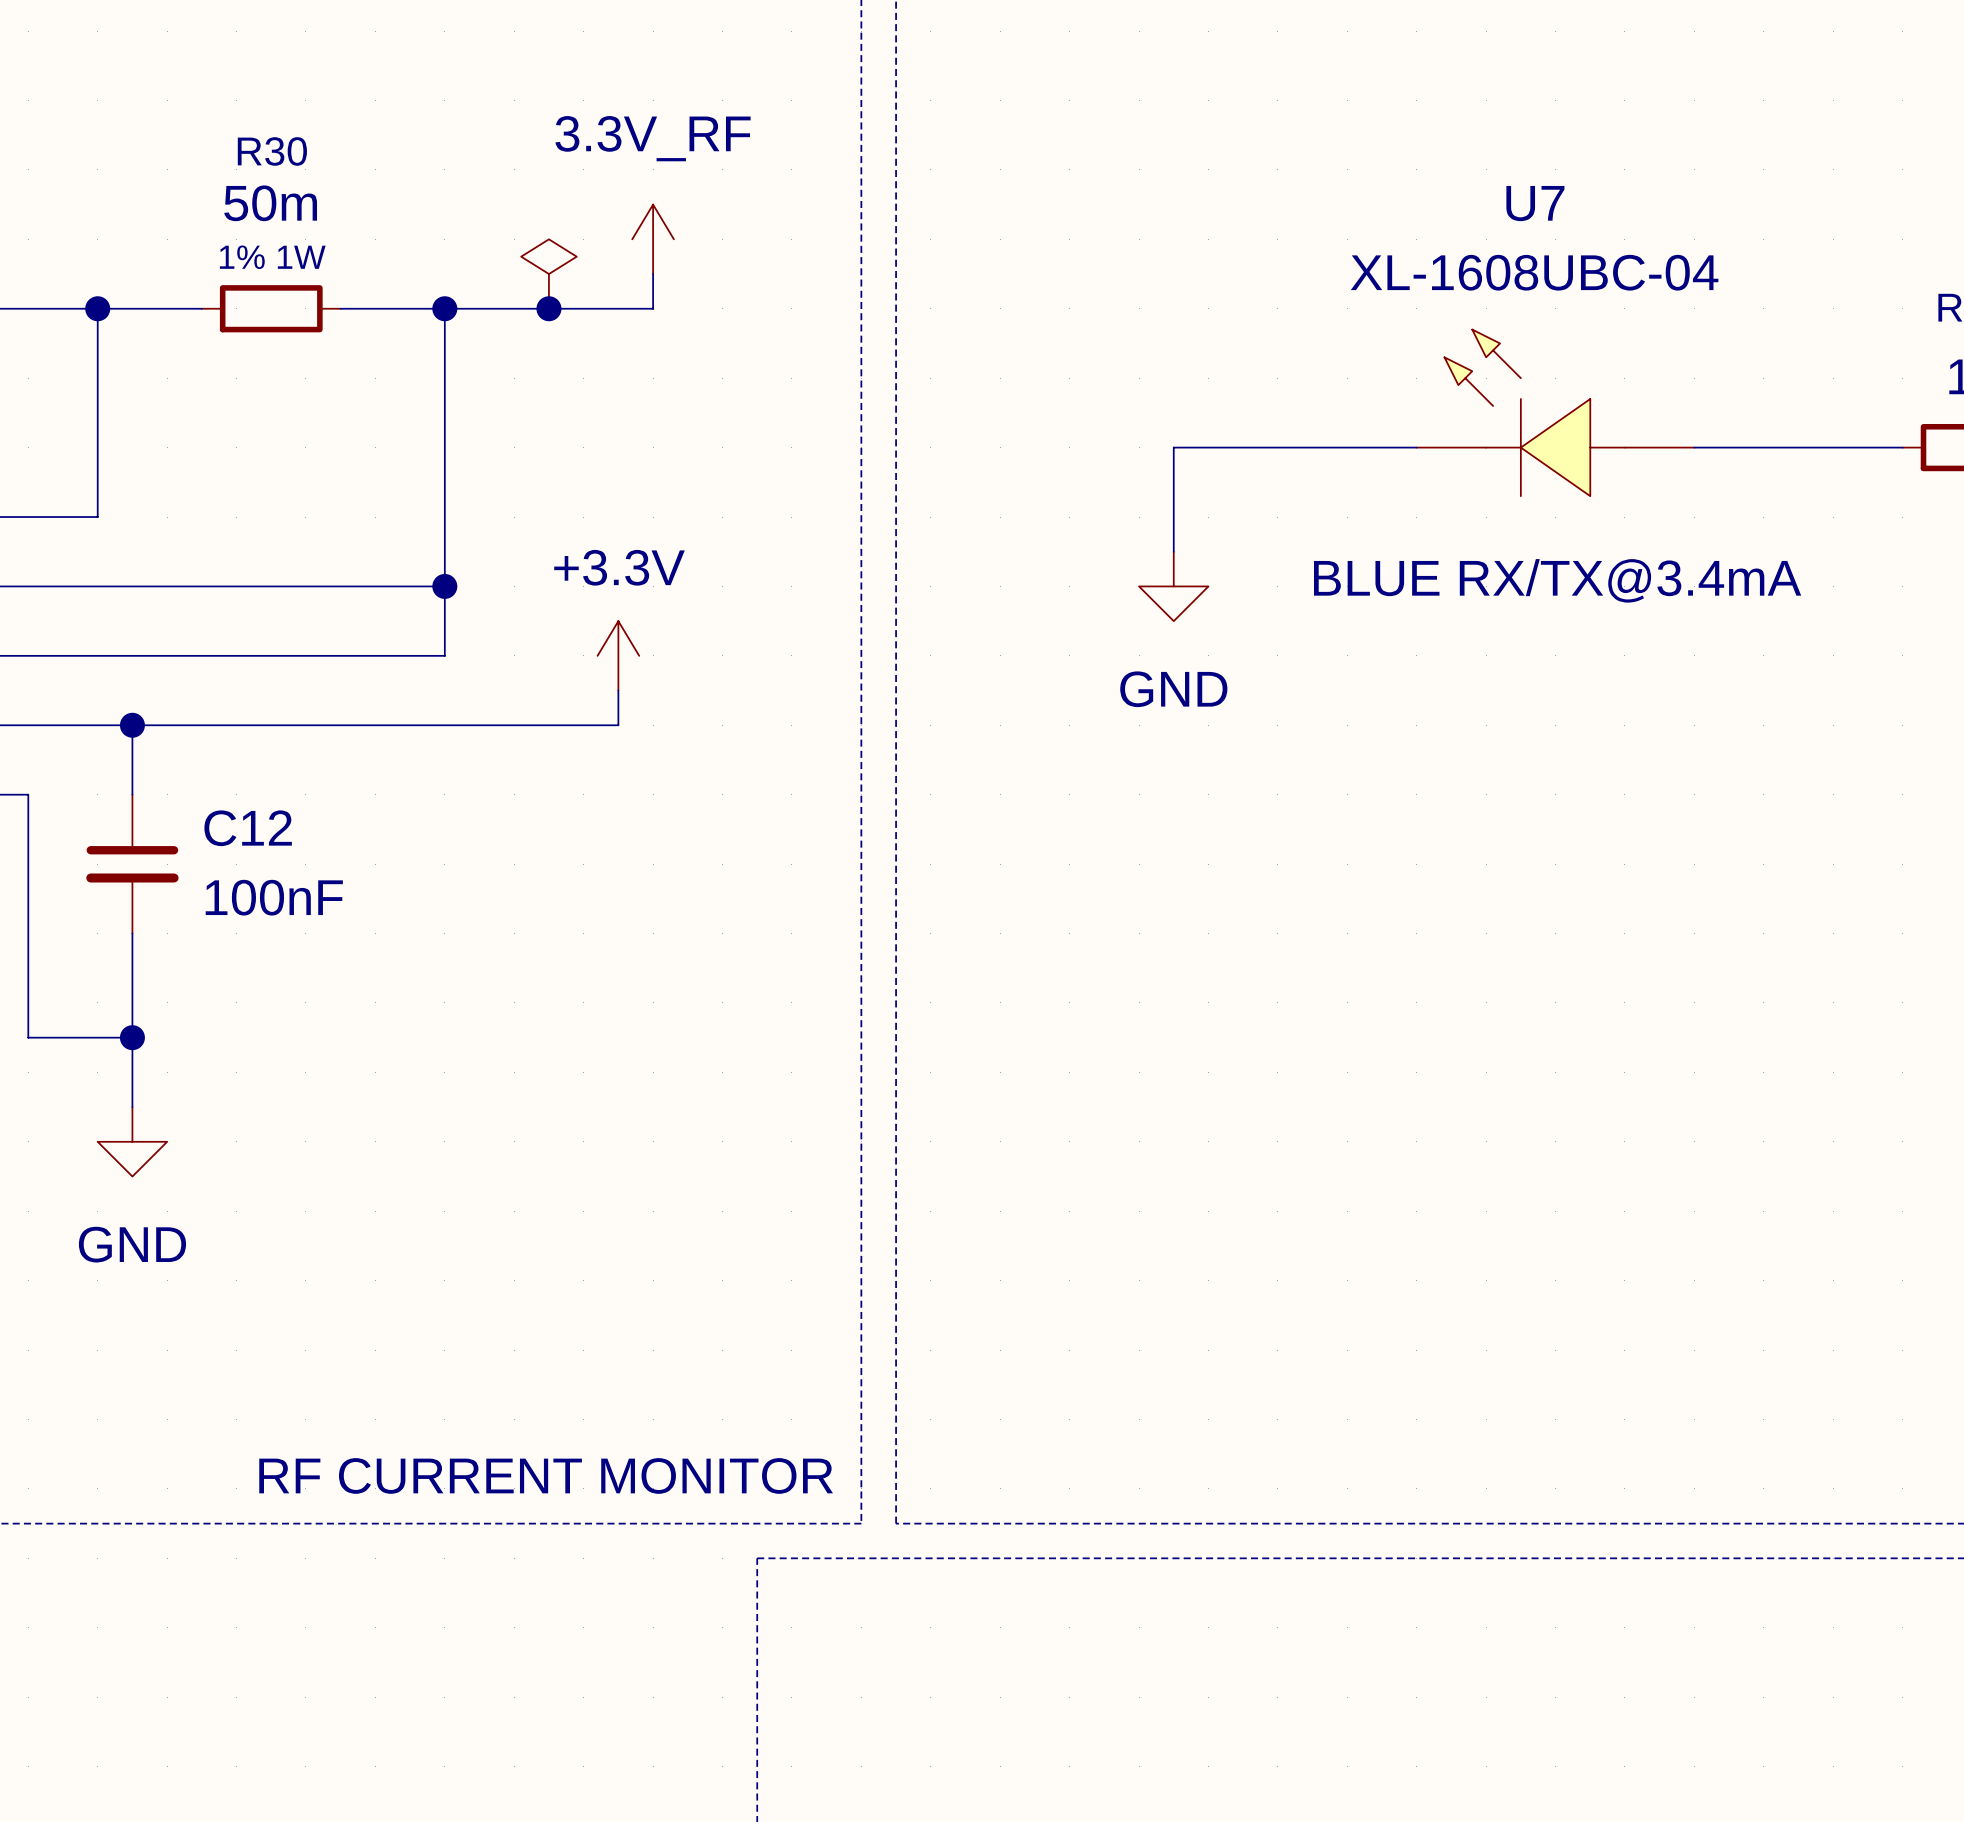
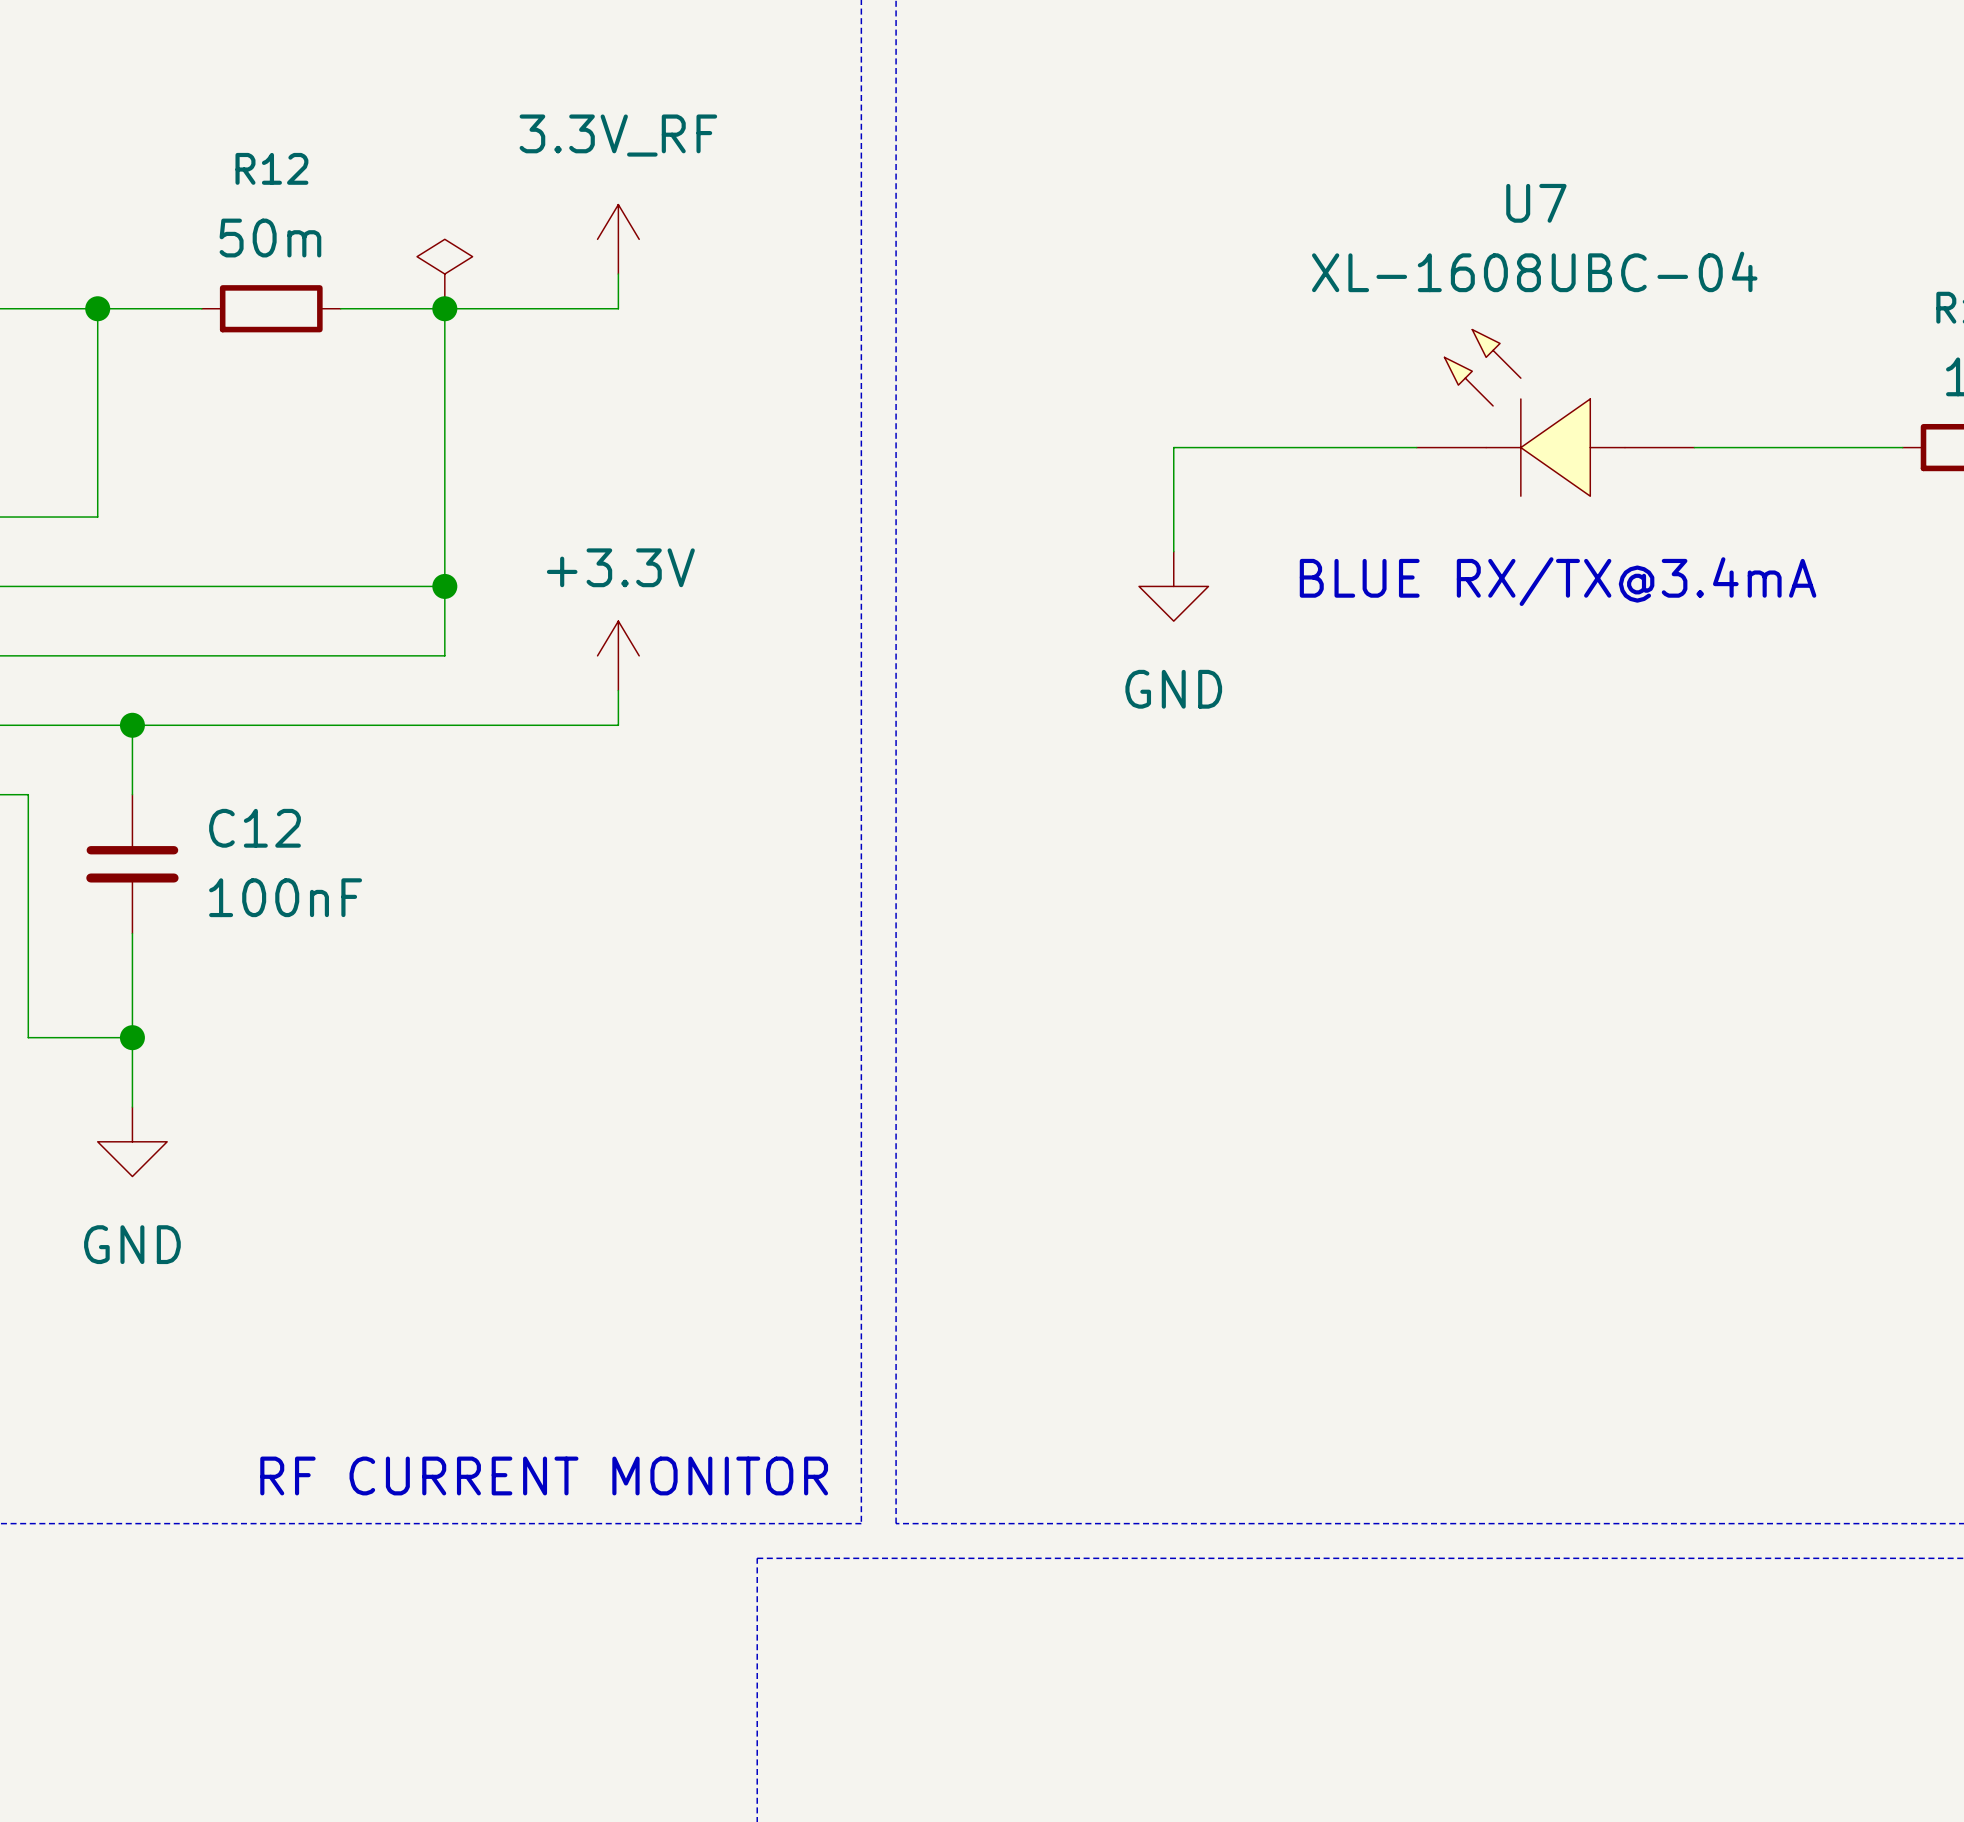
R30 name: R30 (272, 151) -> R12 (271, 168)
R30 value position: 50m (270, 203) -> 50m (270, 238)
power symbol position: 3.3V_RF (653, 239) -> 3.3V_RF (618, 239)
R30 text: 1% 1W (272, 257) -> none
power symbol position: (548, 274) -> (444, 274)
wire: (653, 274) (653, 308) (618, 308) -> (618, 274) (618, 308)
junction: (548, 308) -> none

